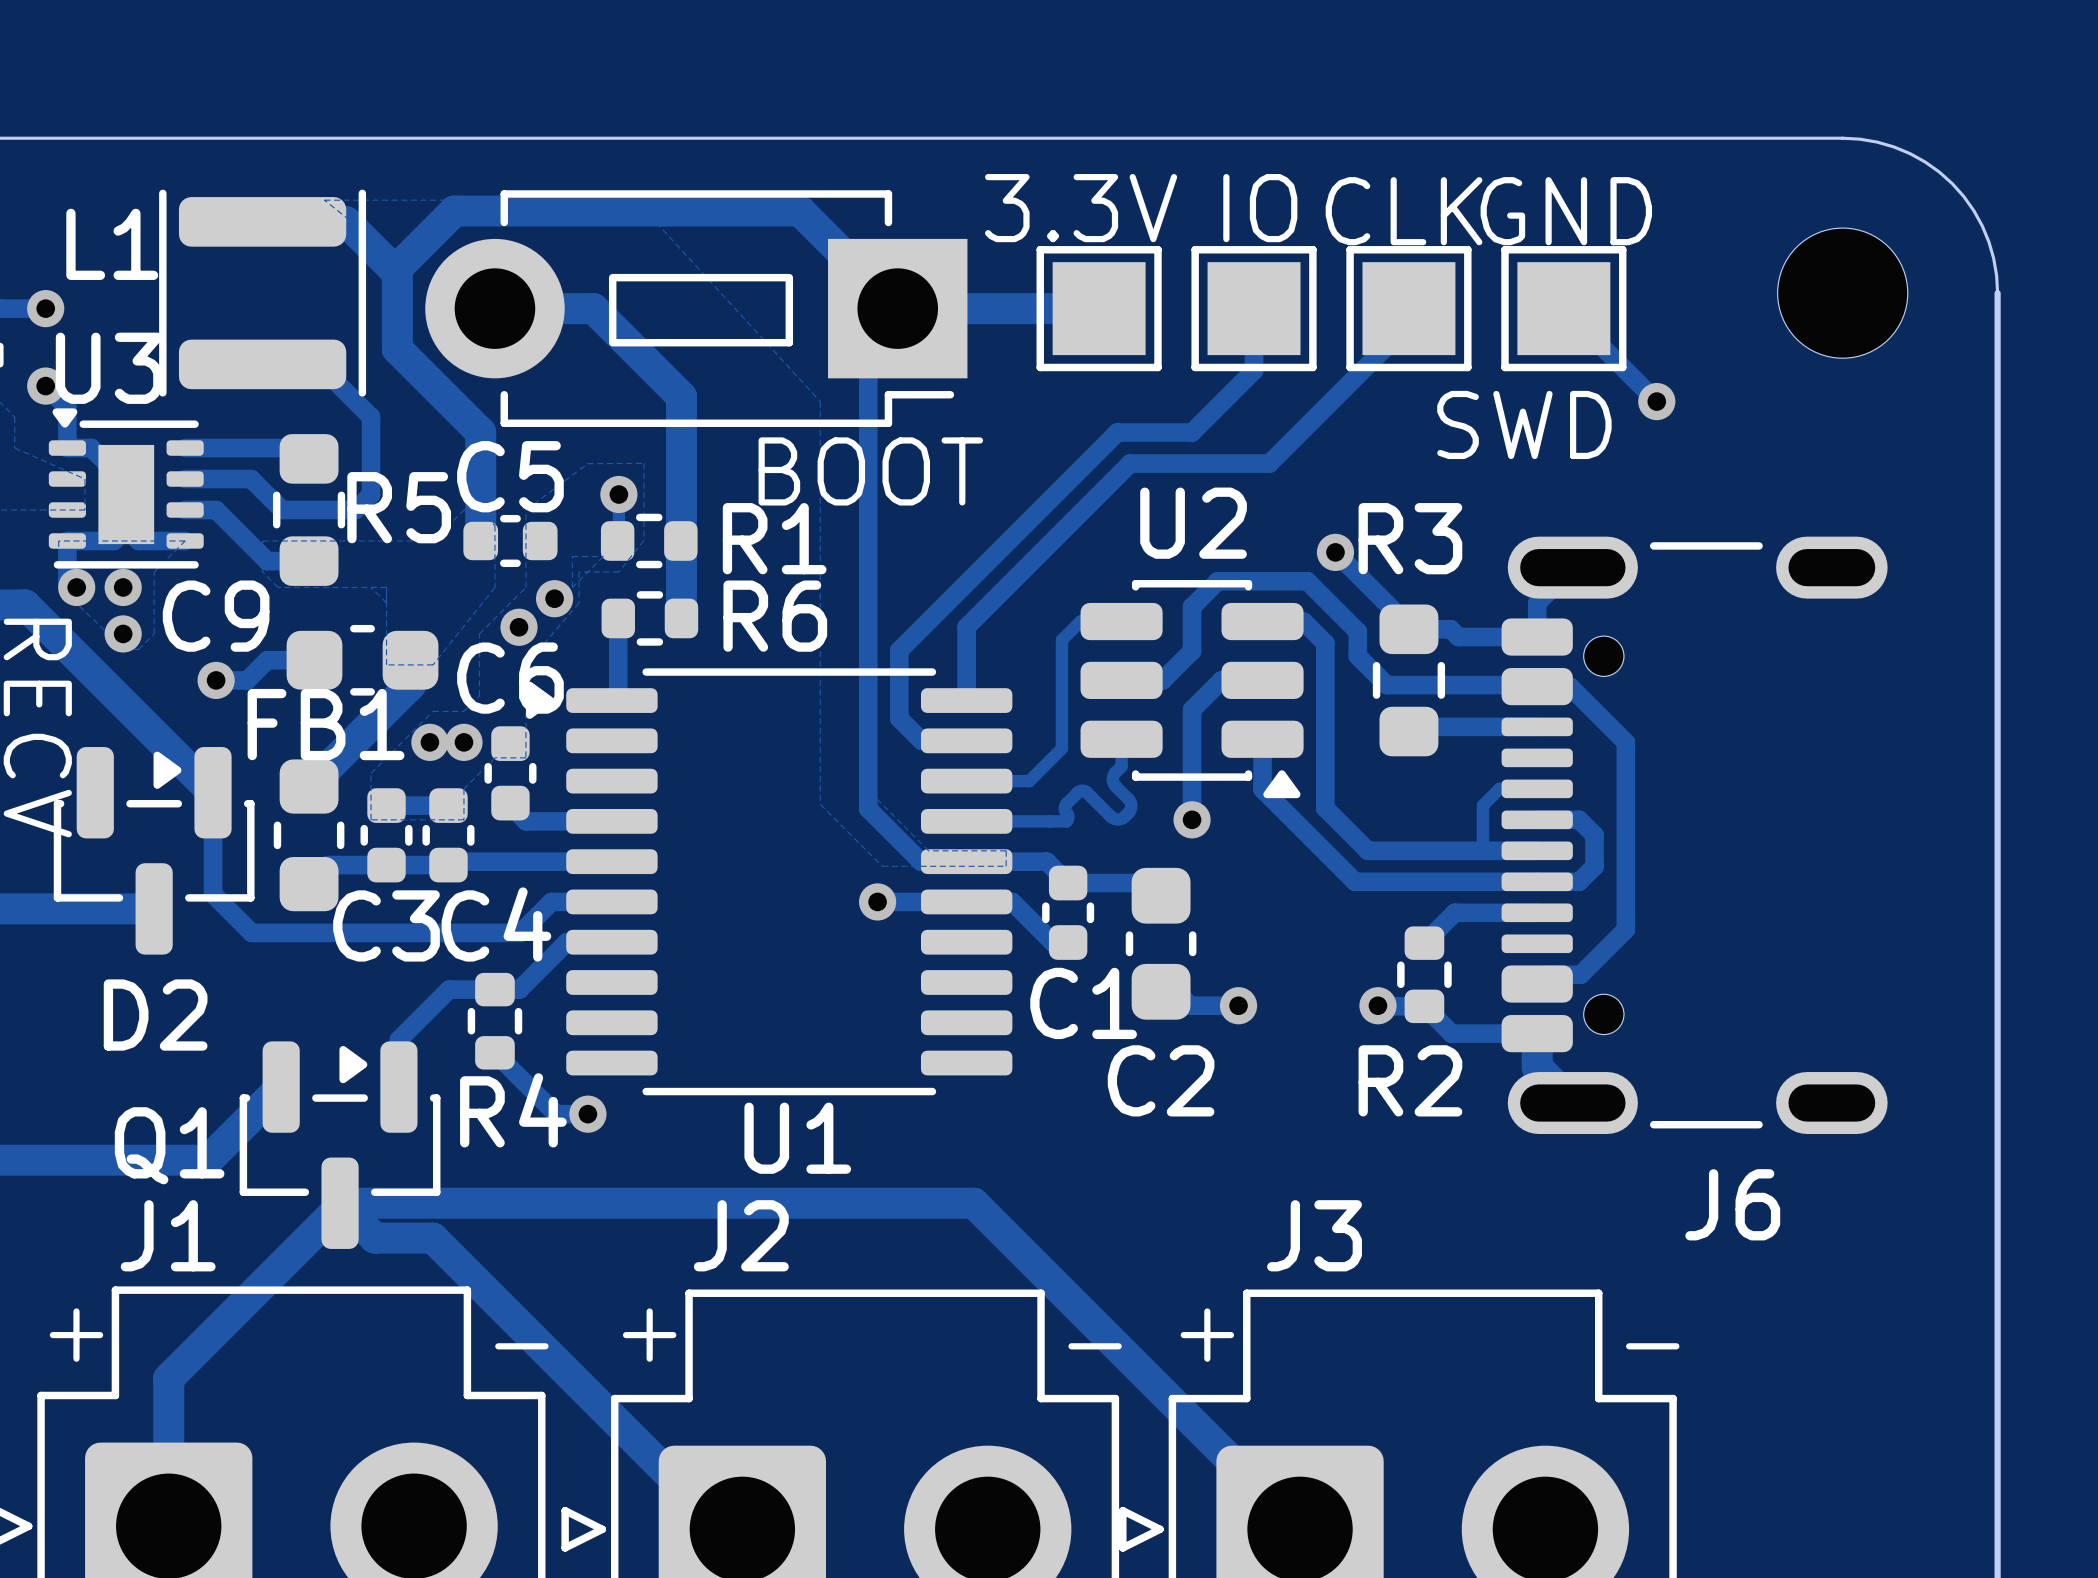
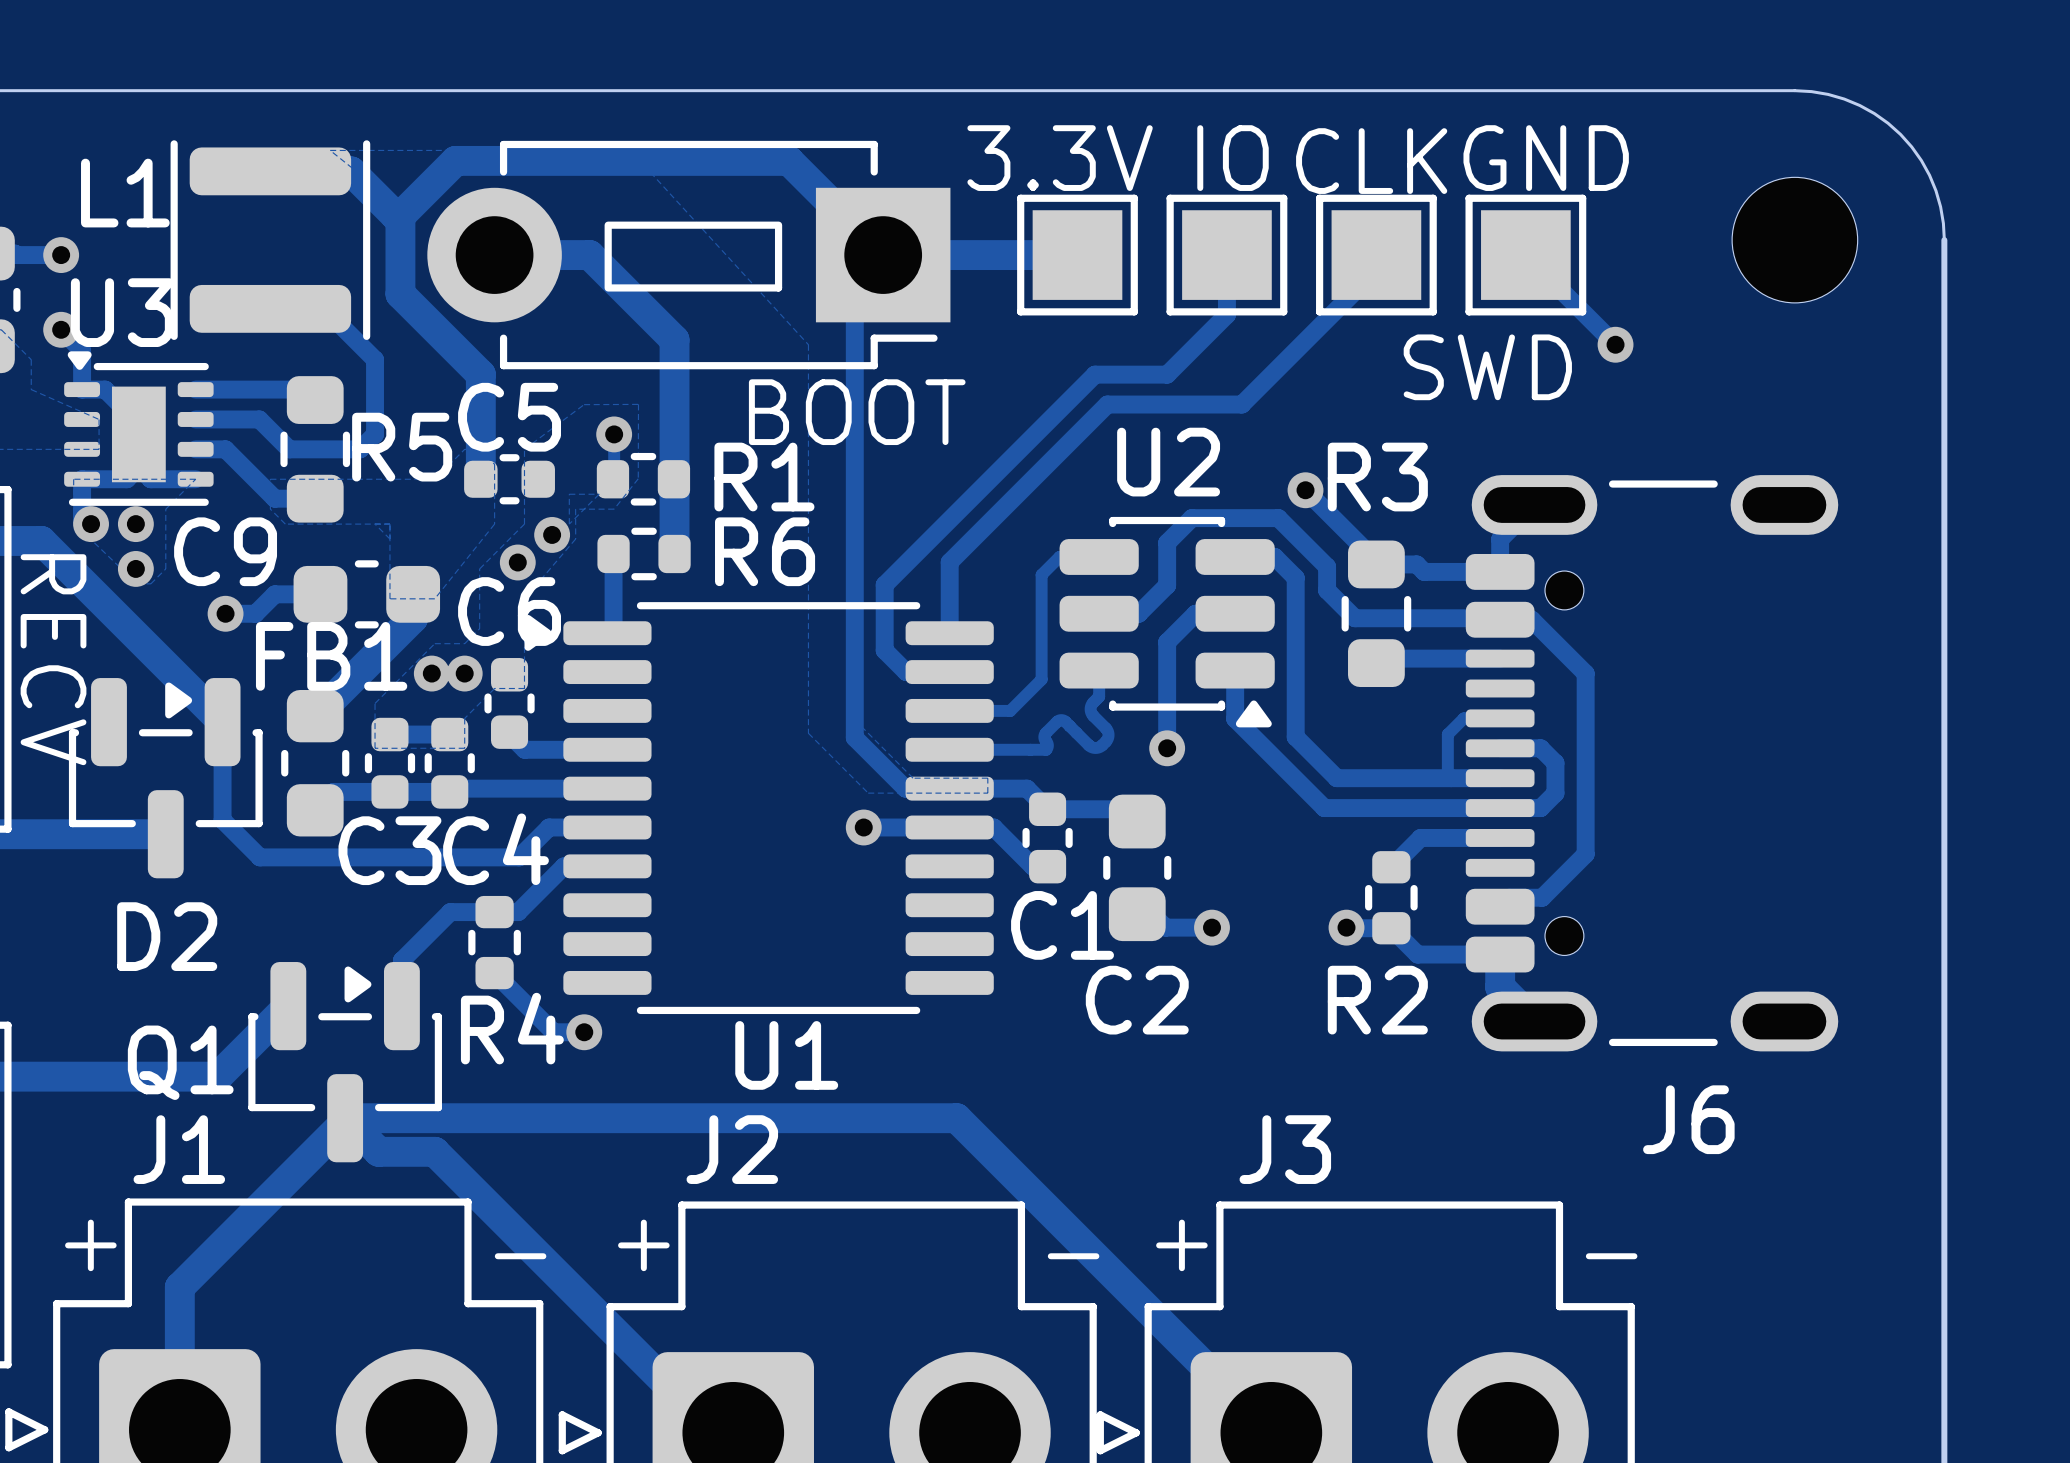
text position: GND (1566, 211) -> GND (1546, 158)

